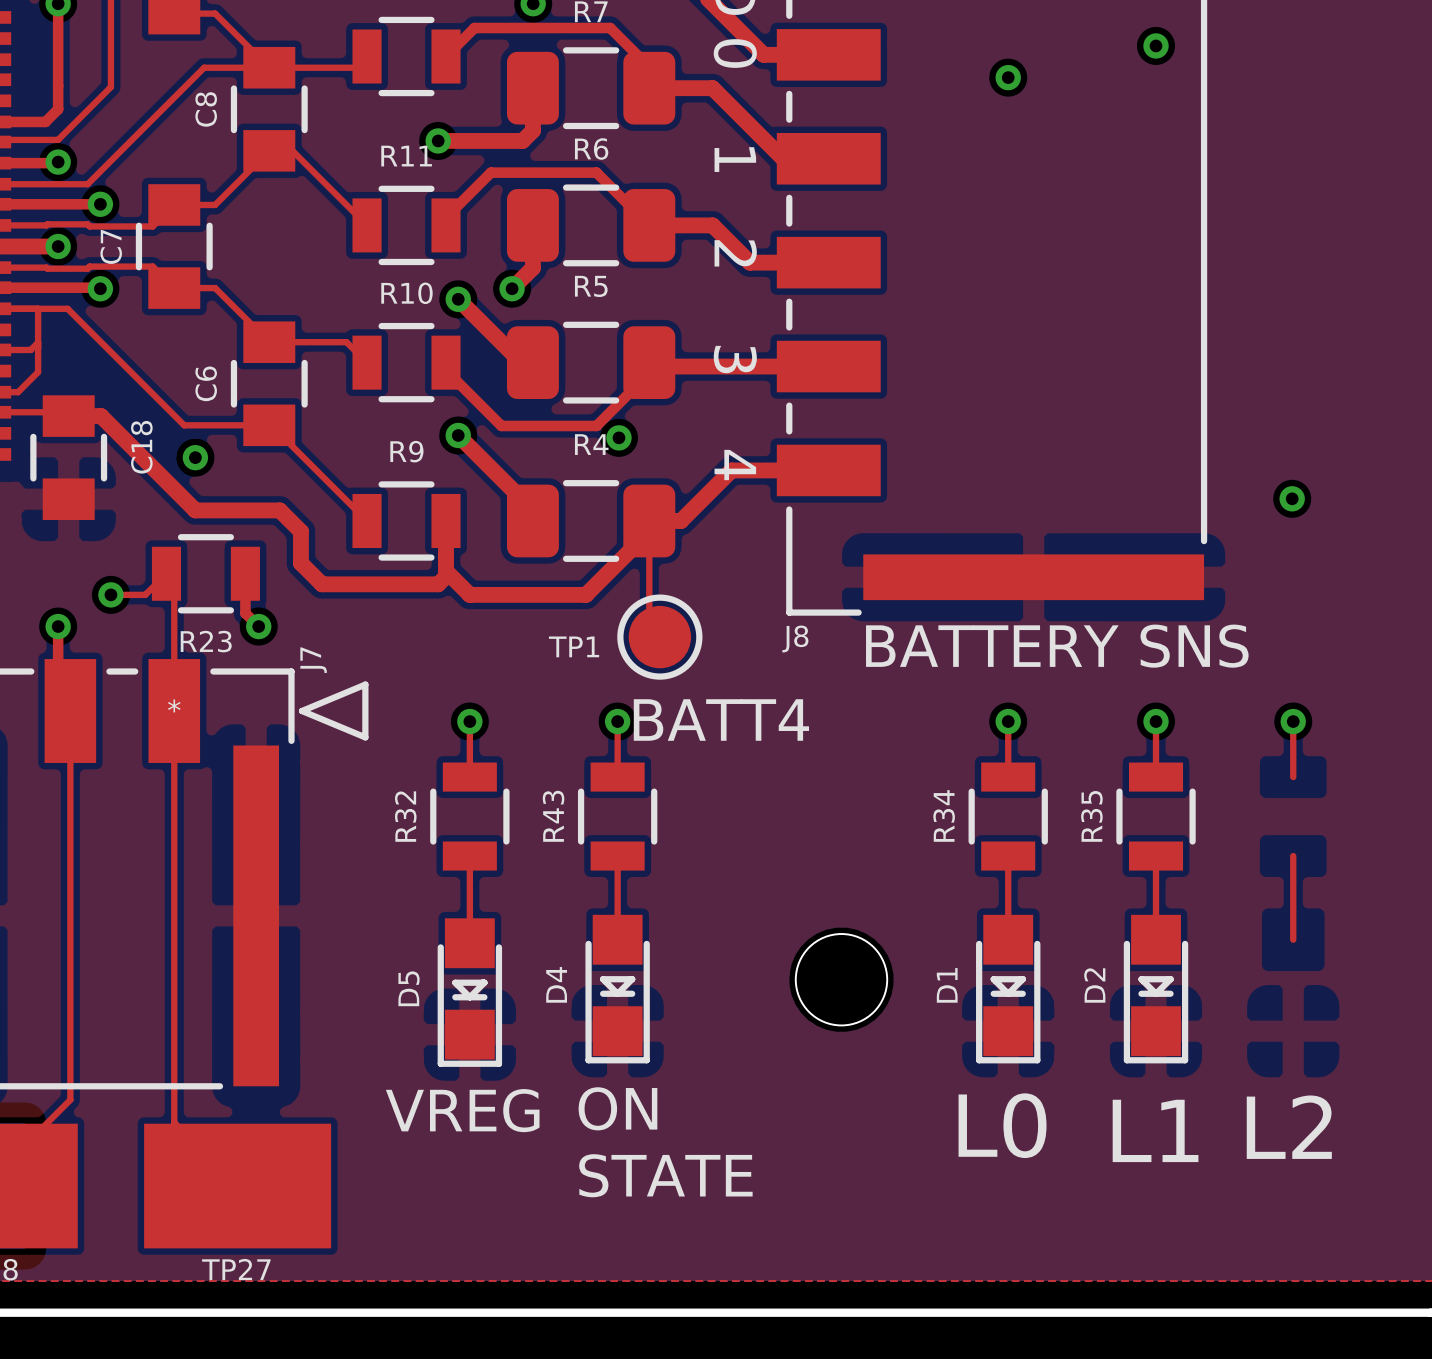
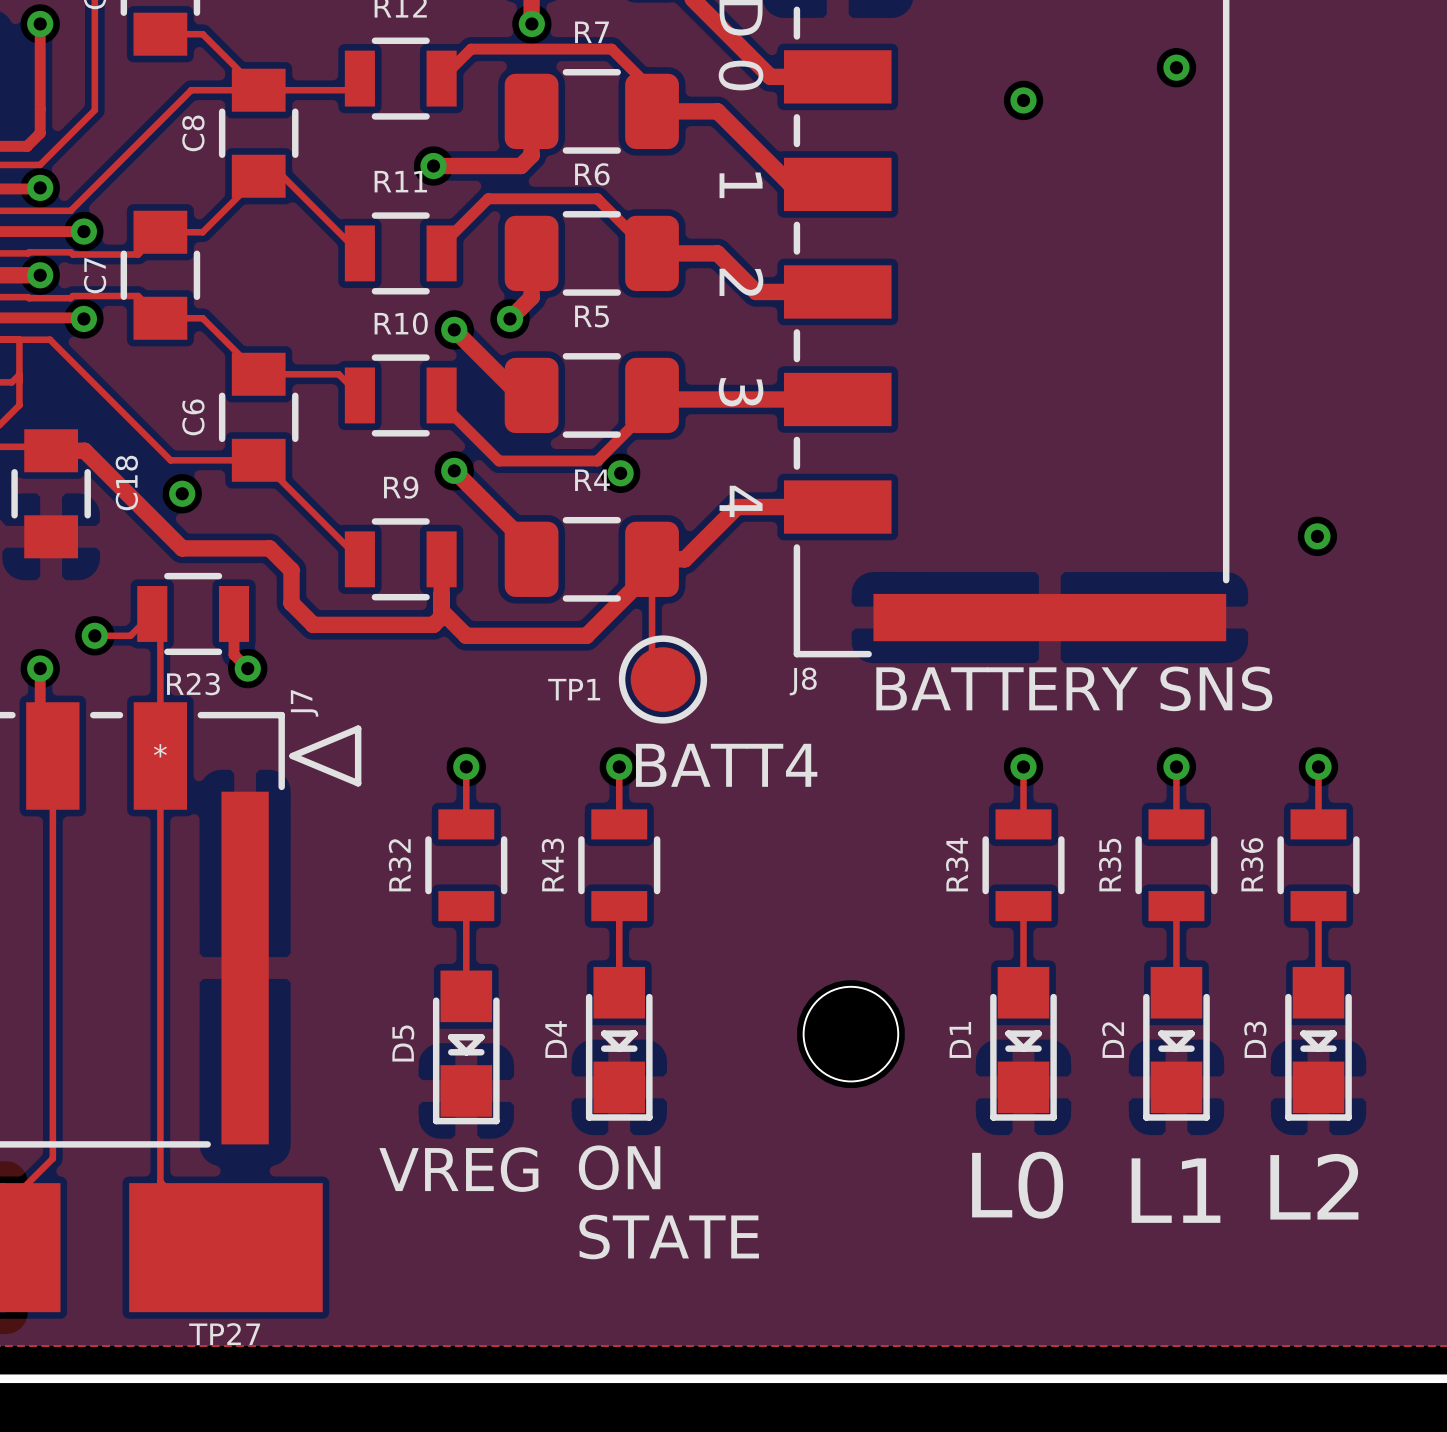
R36: none -> (1318, 865)
D3: none -> (1318, 1043)

